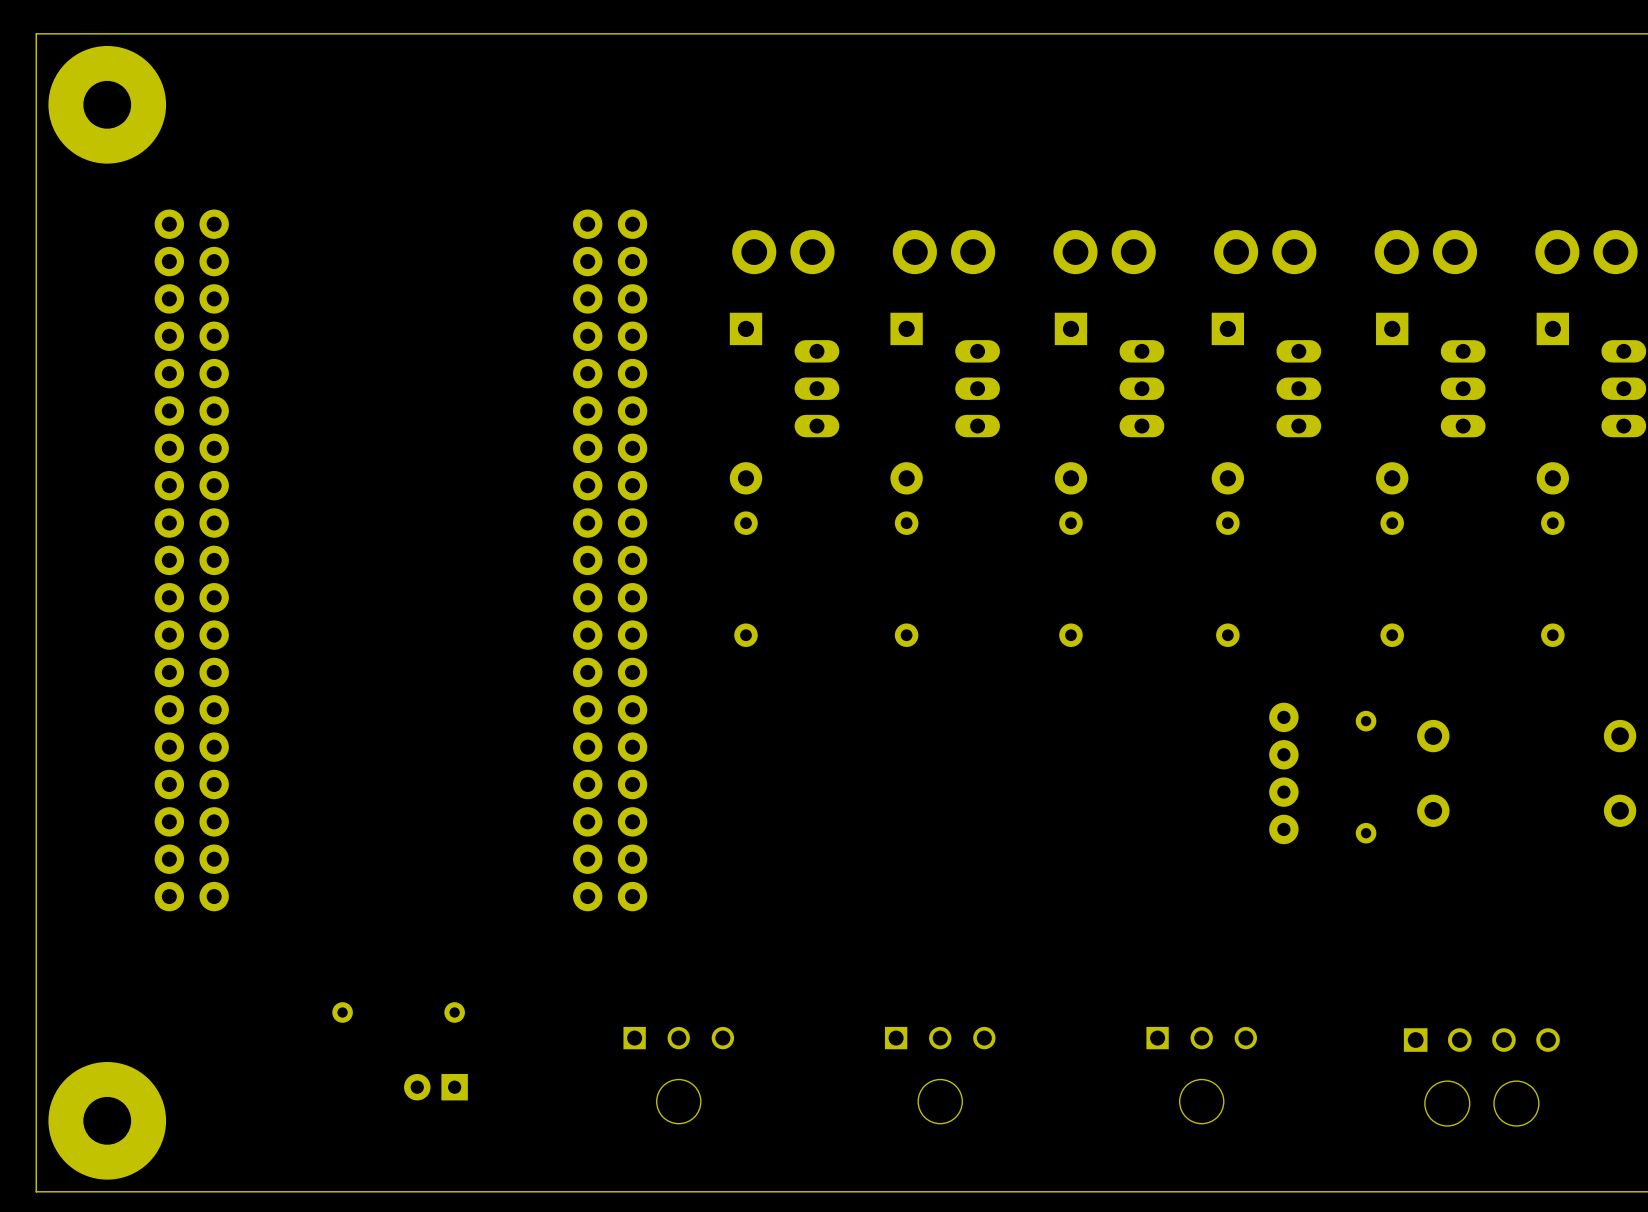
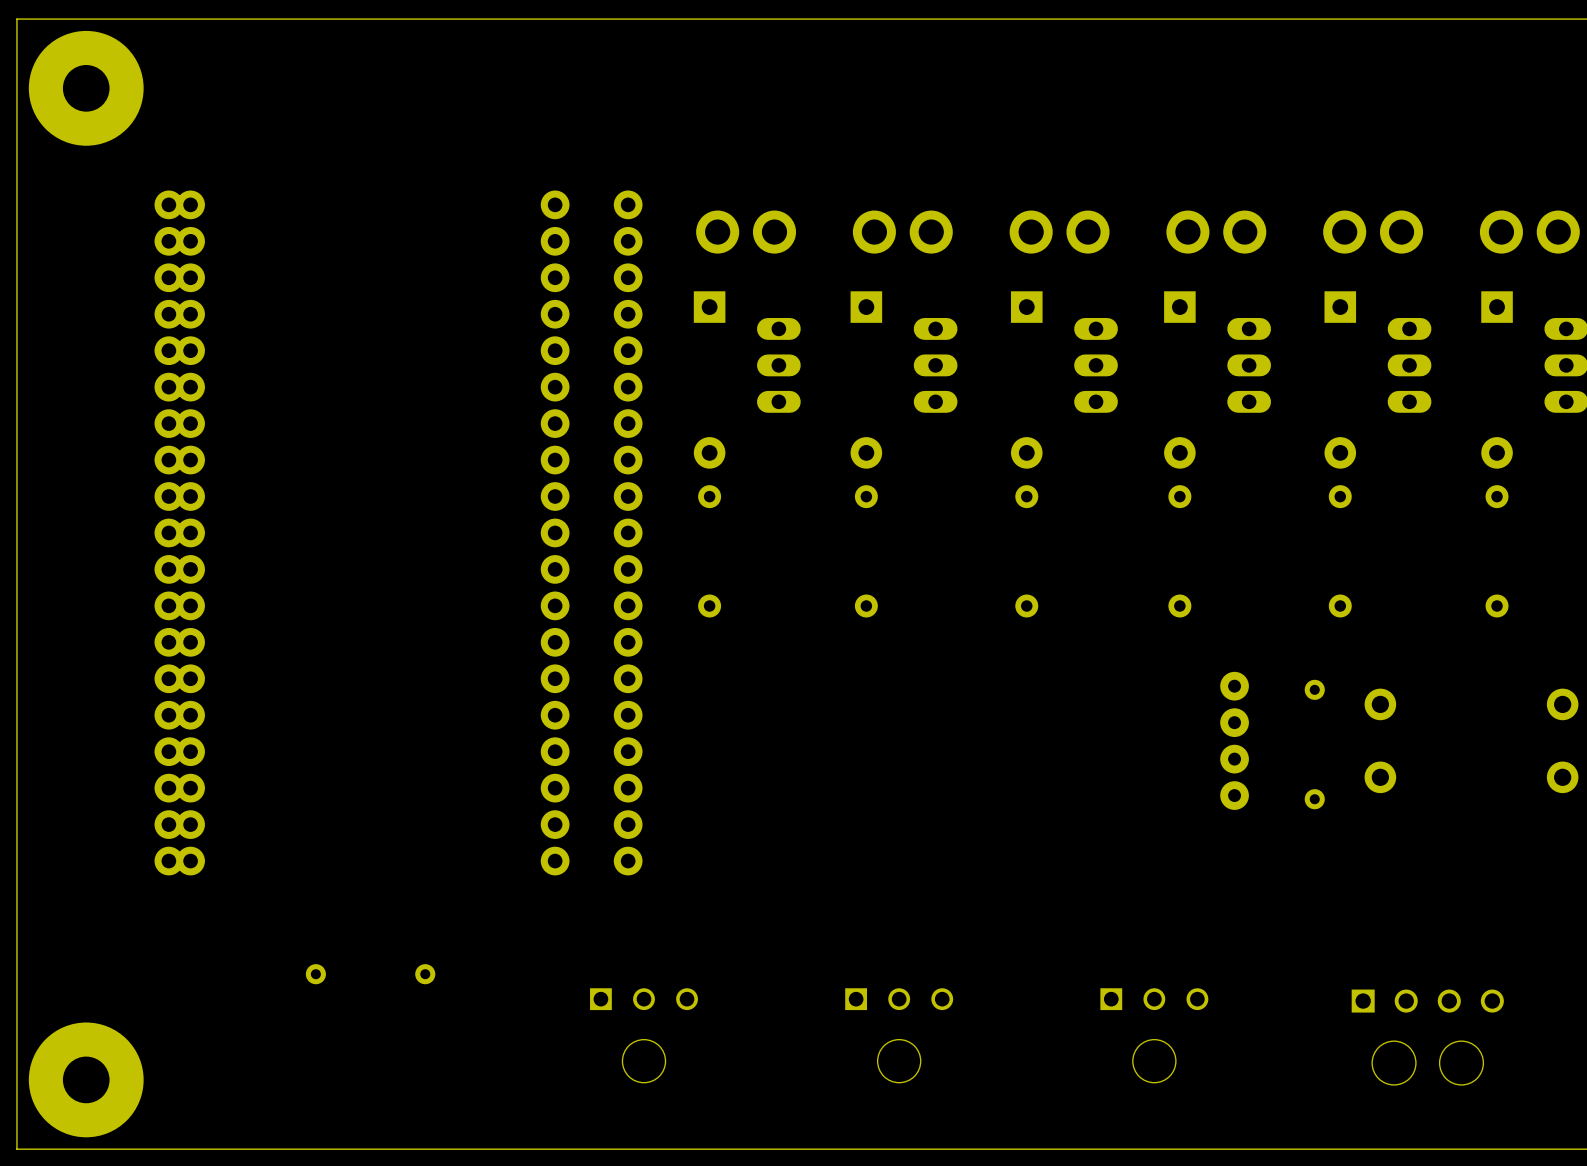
part position: (169, 560) -> (168, 532)
part position: (632, 560) -> (628, 532)
part: (435, 1087) -> none

